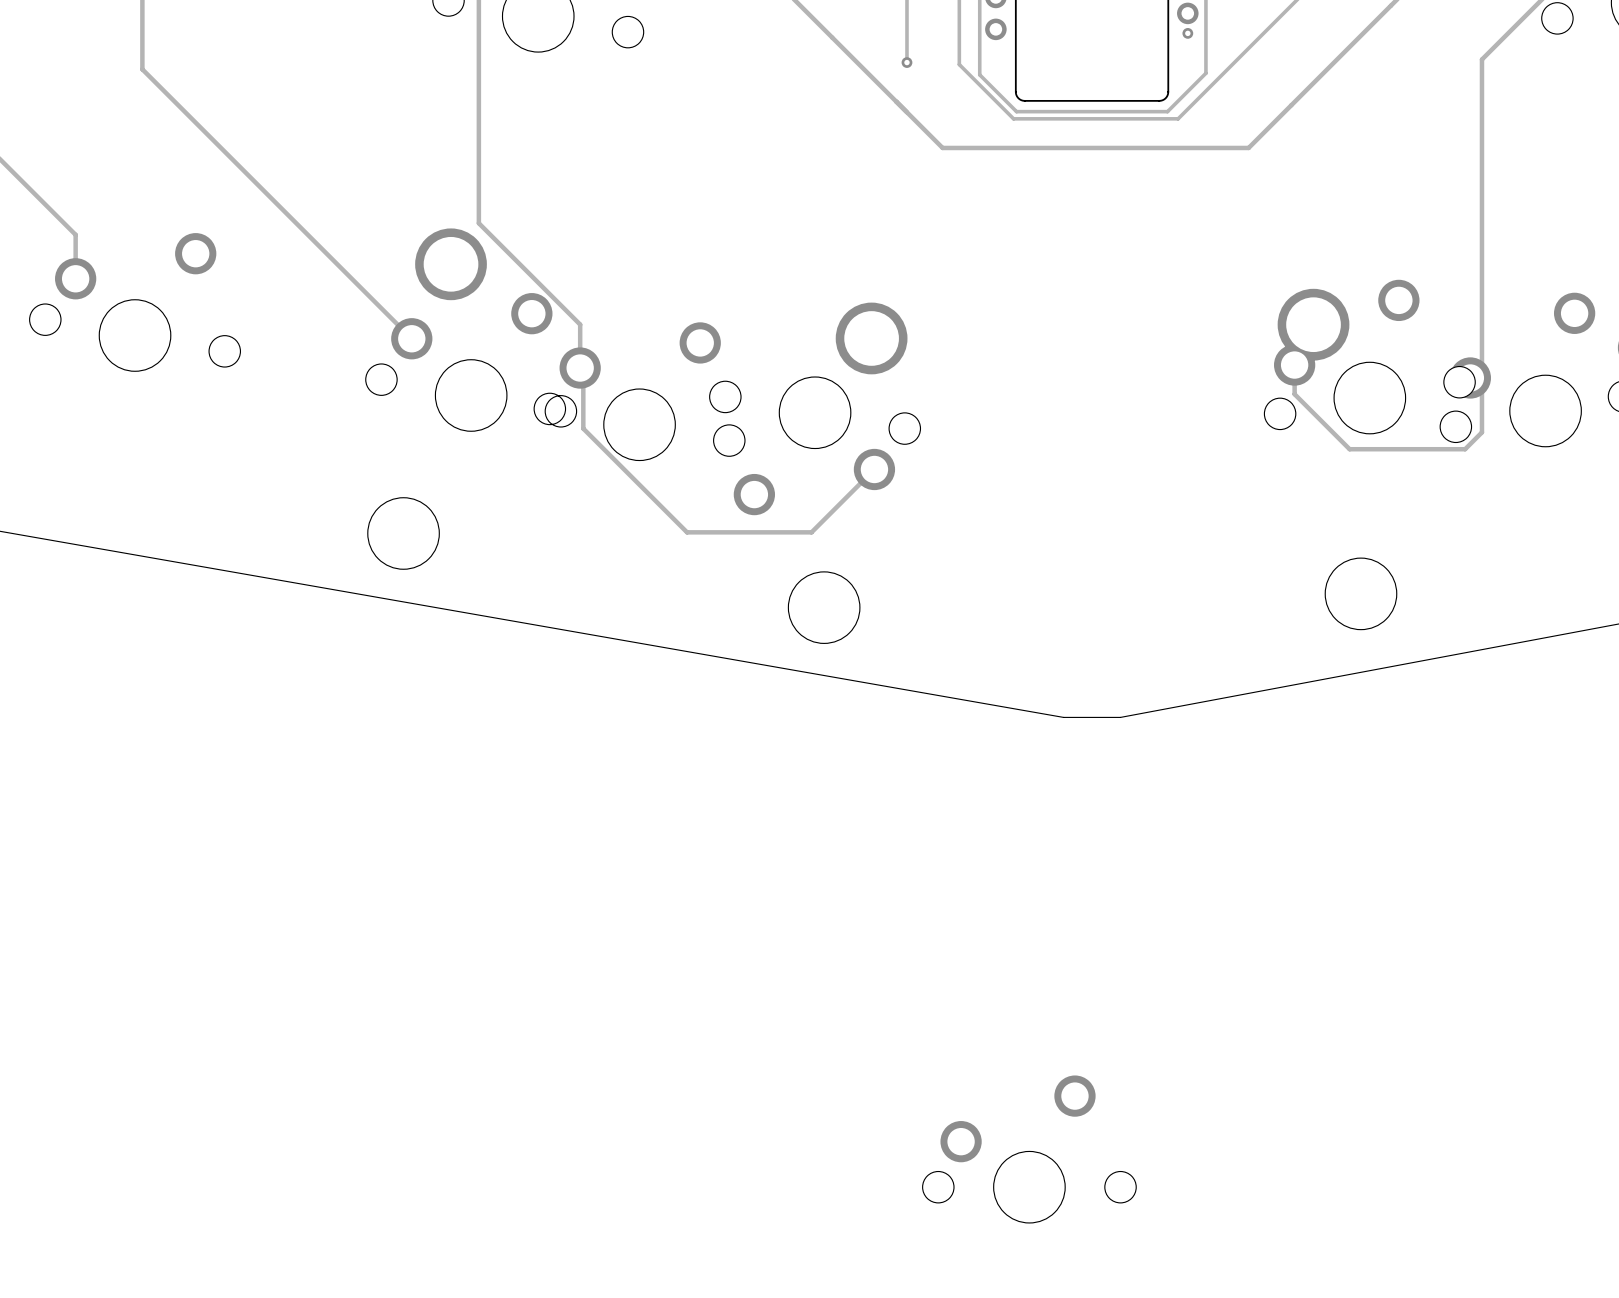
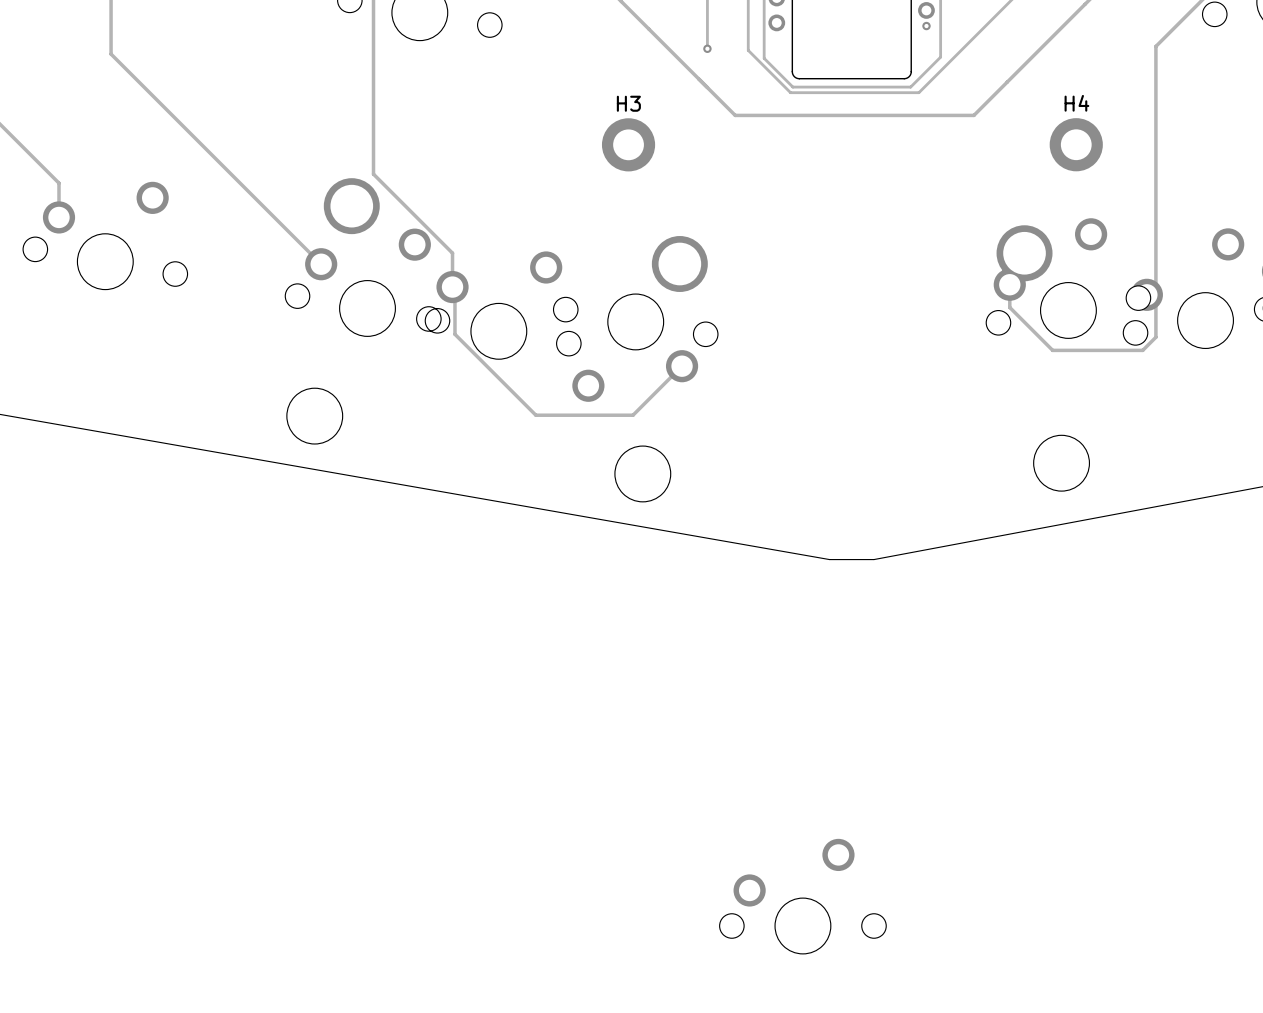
H3: none -> (628, 144)
H4: none -> (1076, 144)

